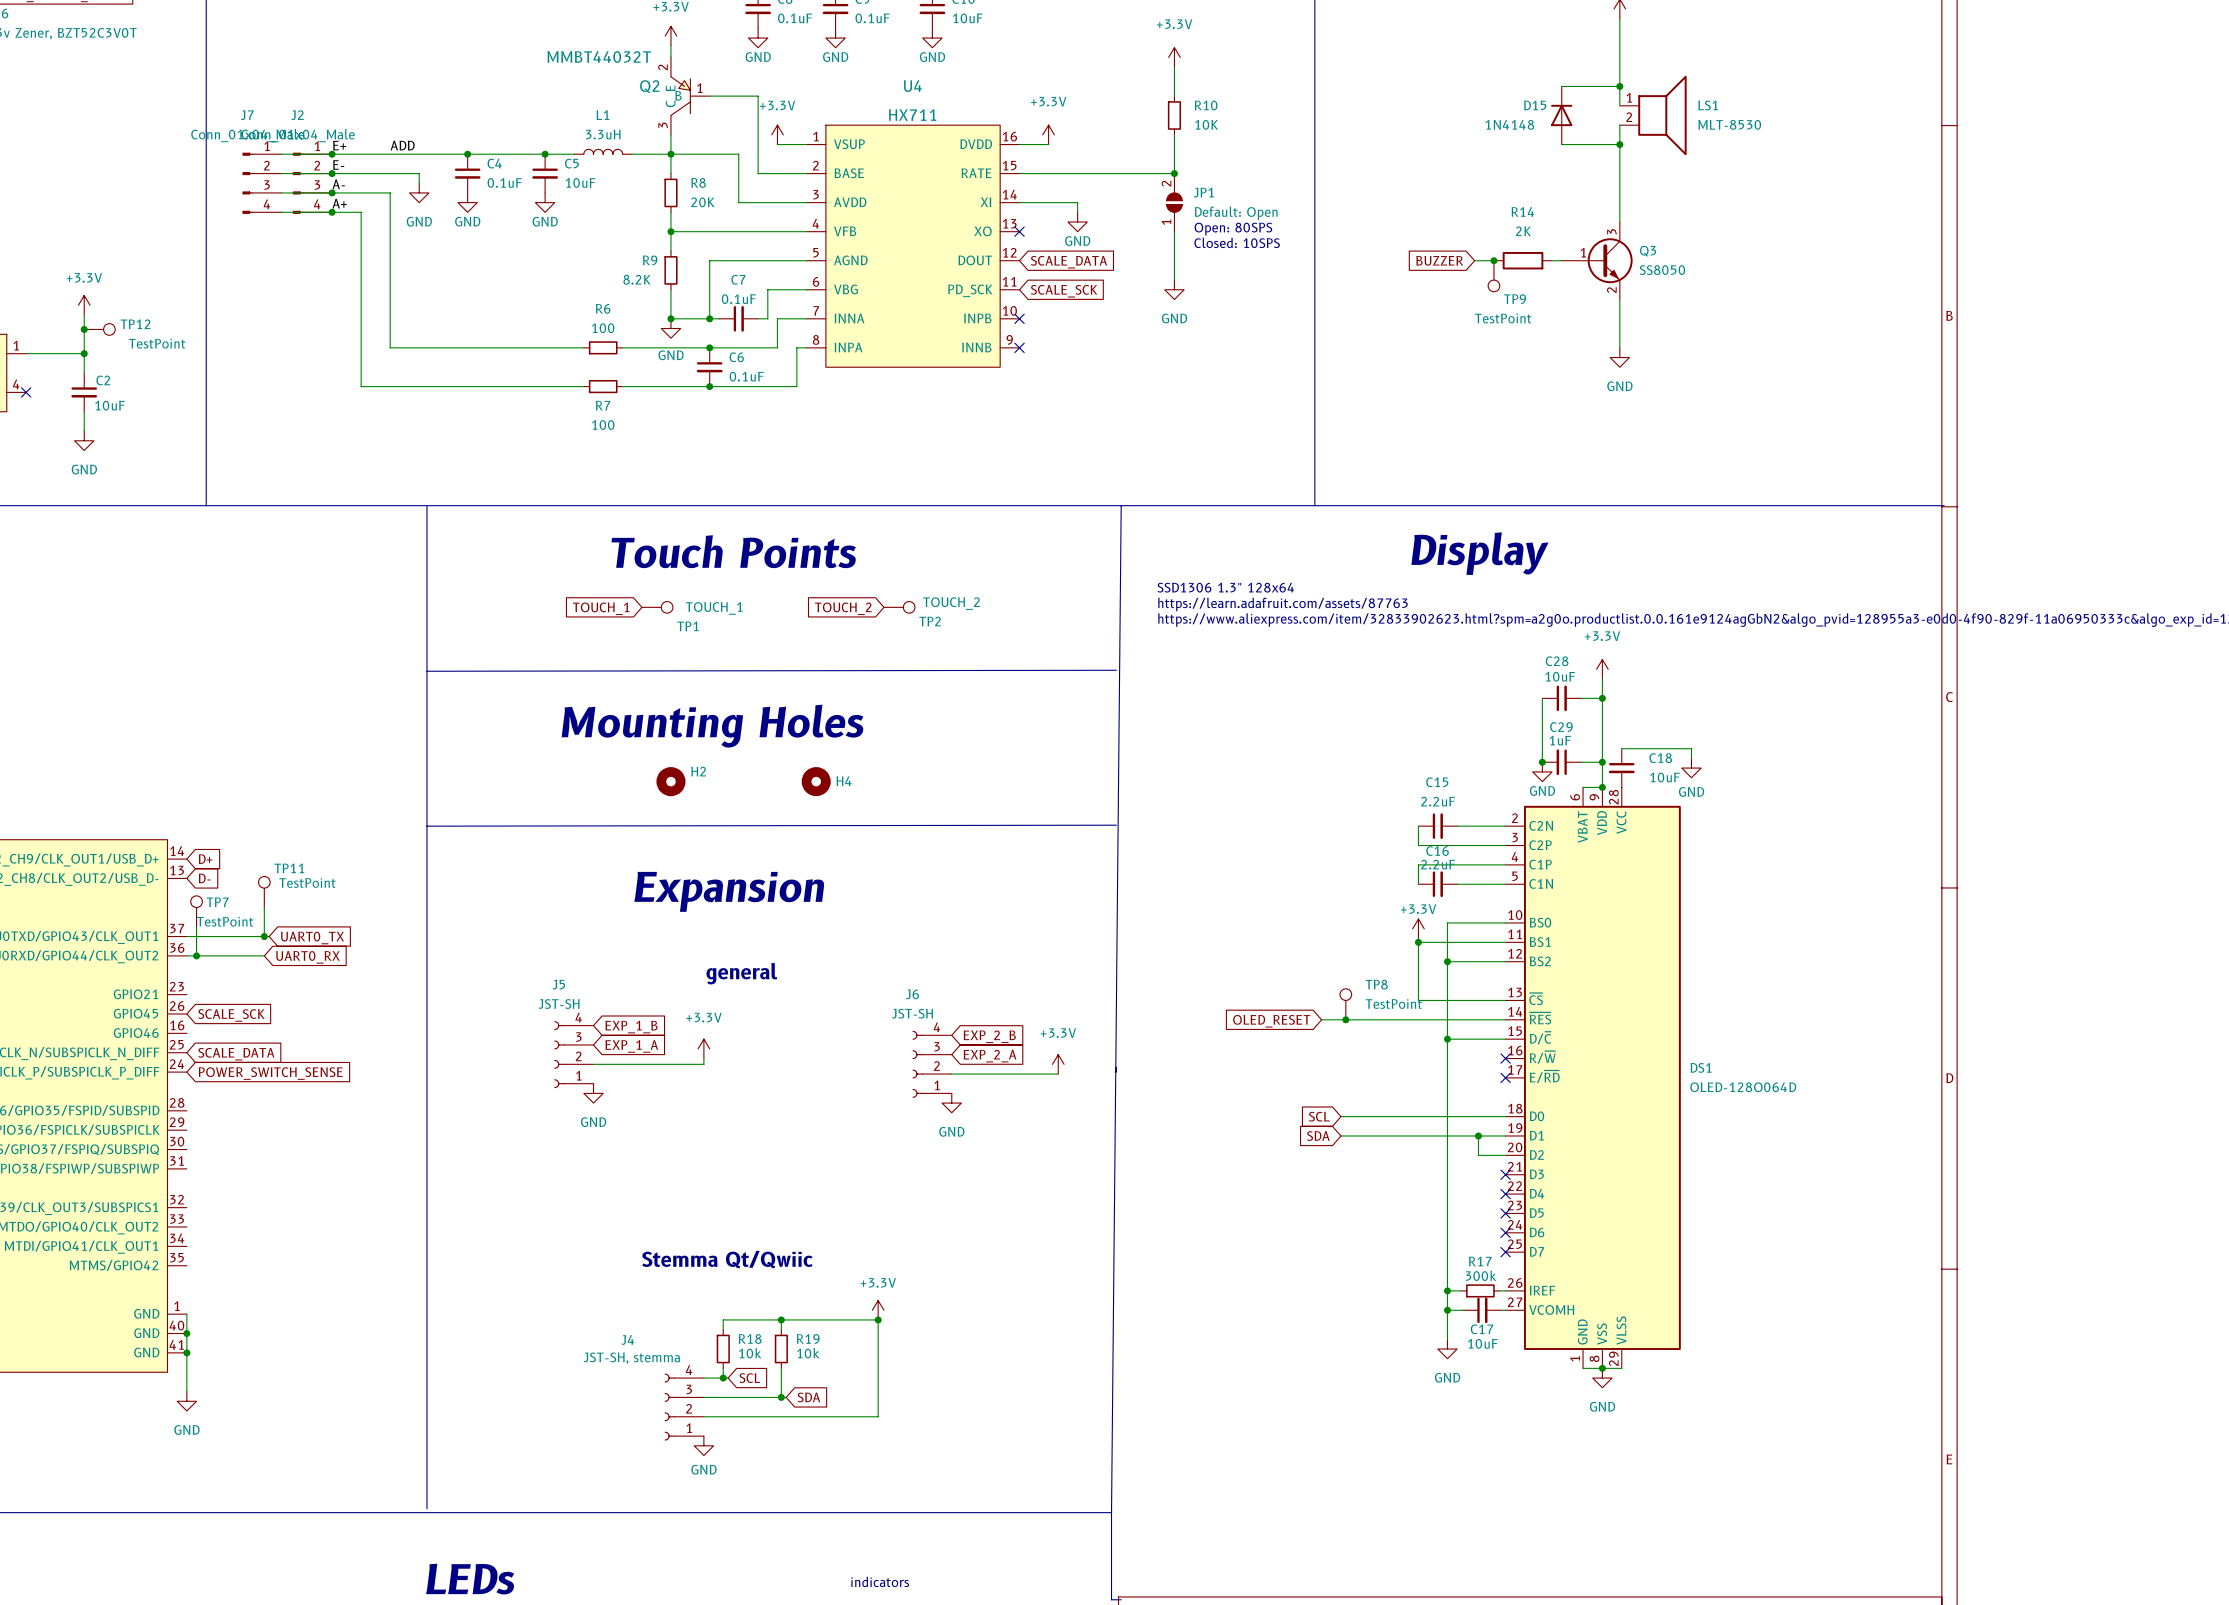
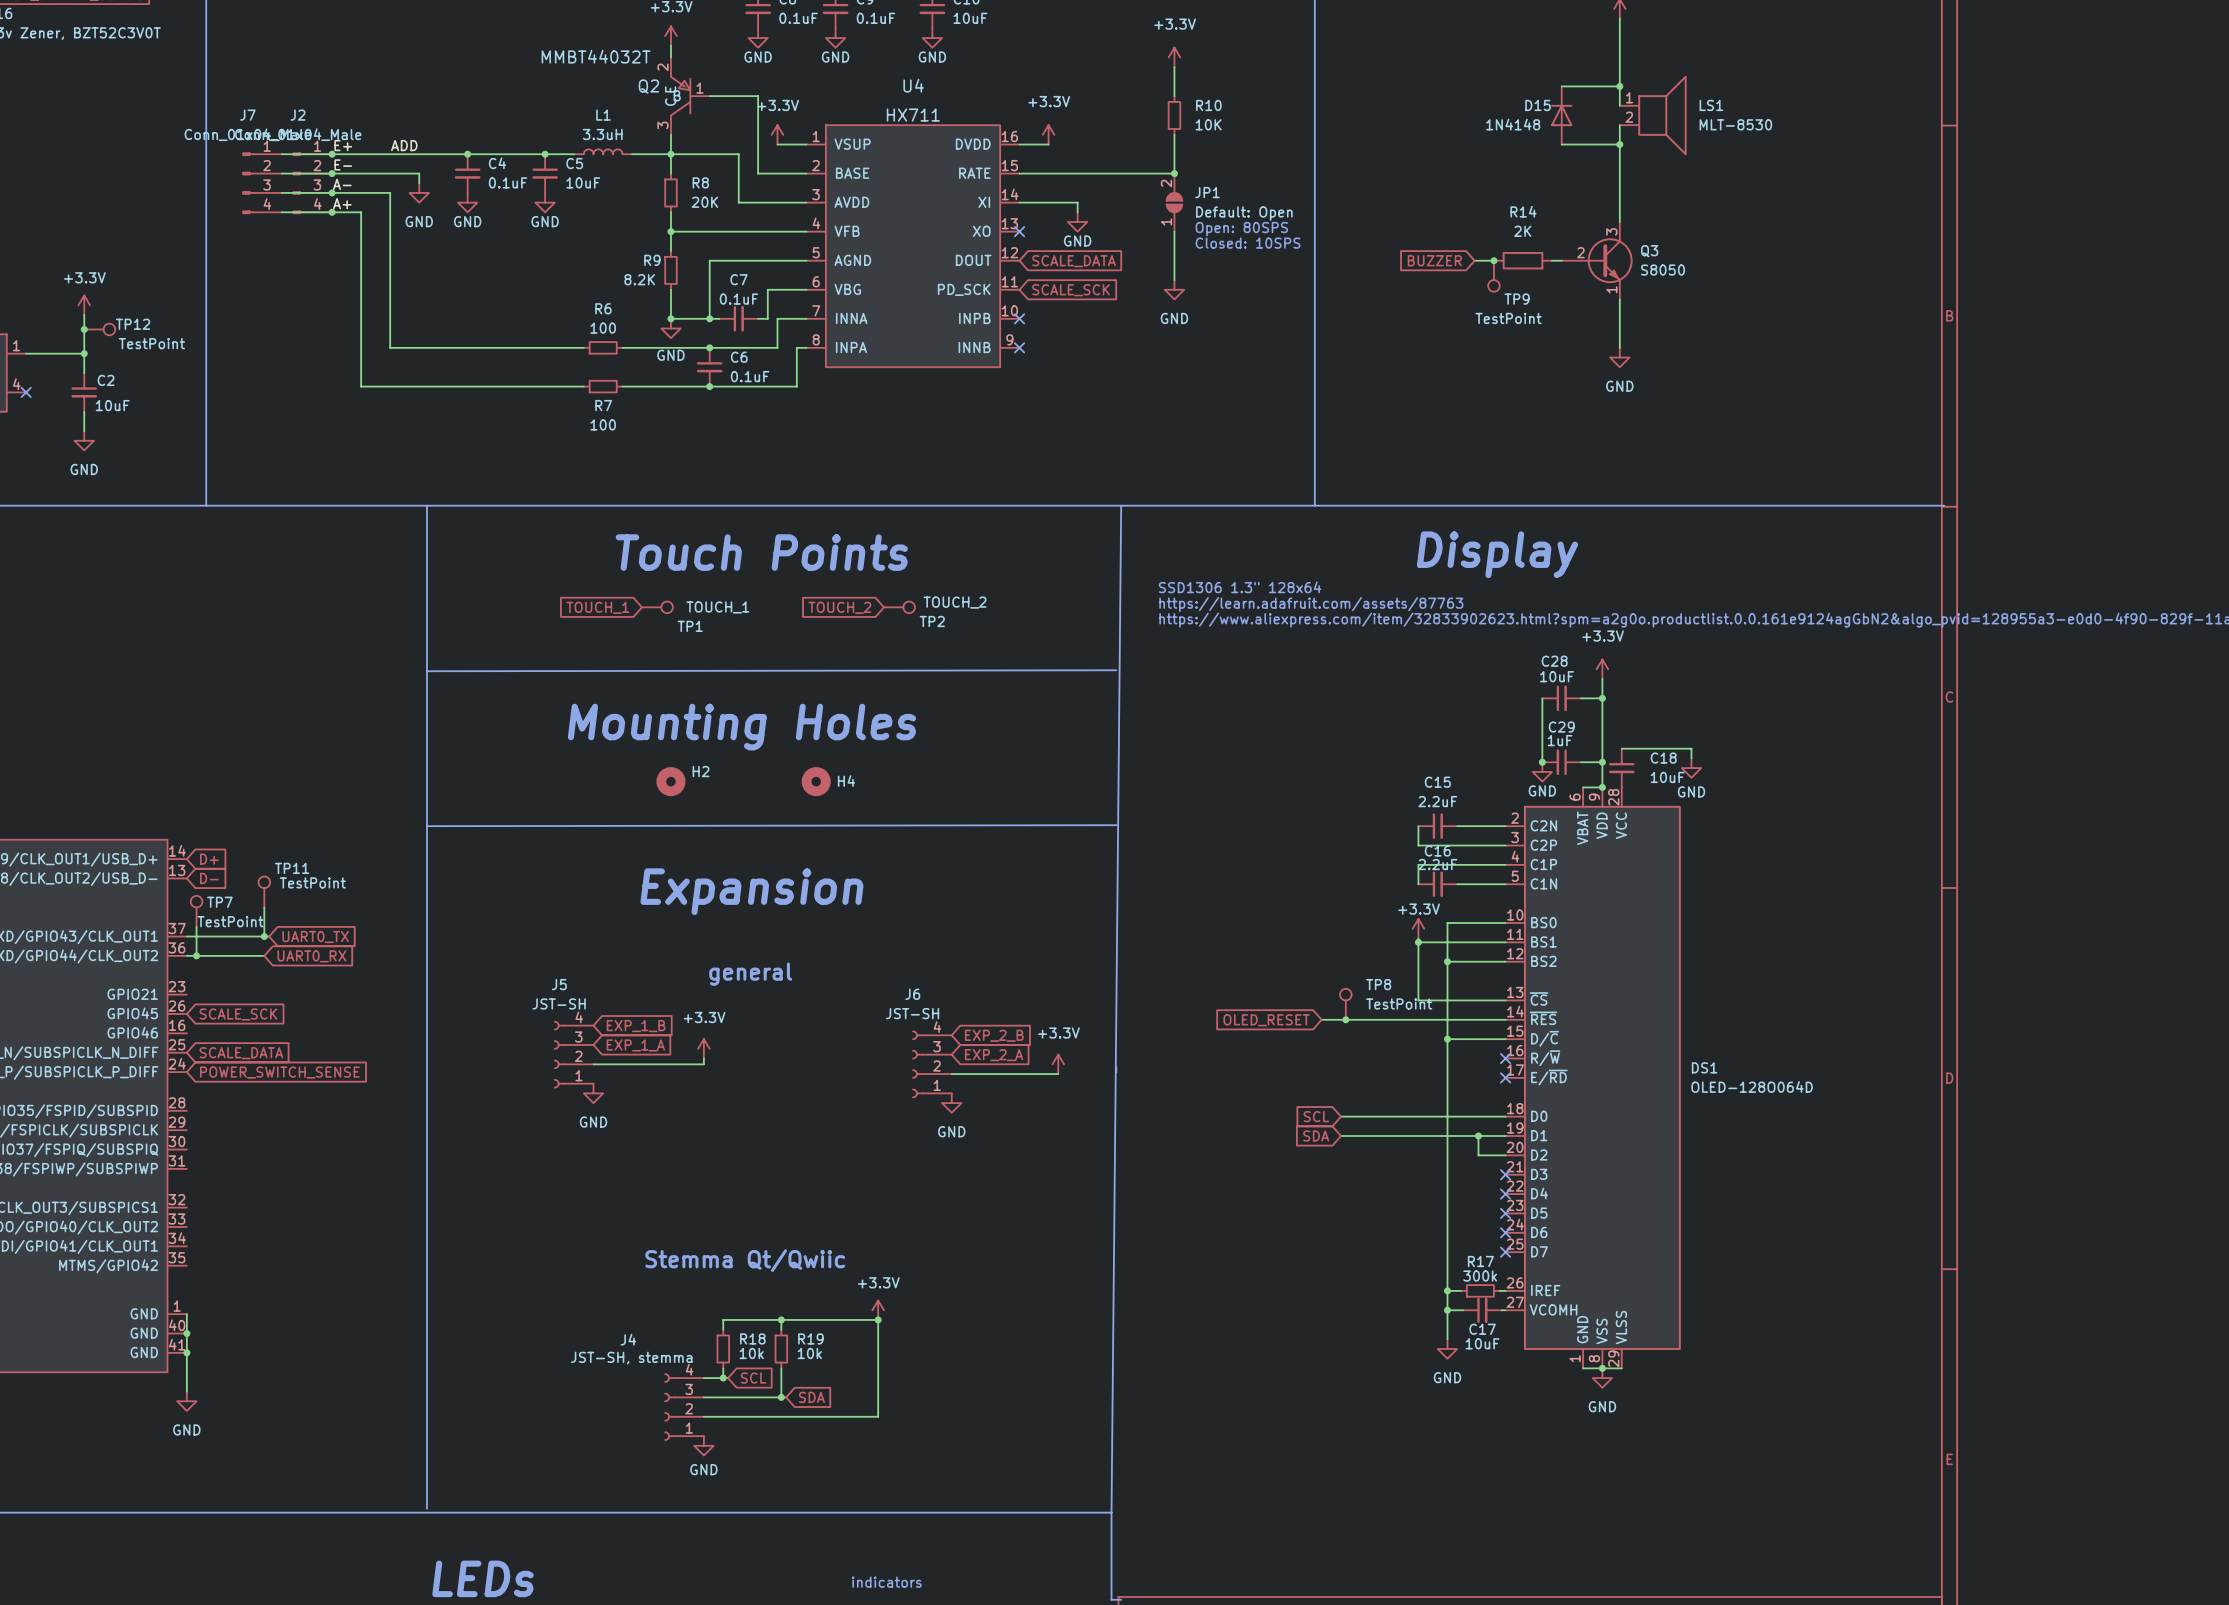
Q3 symbol: [1561, 221, 1633, 300] -> [1561, 221, 1633, 300]
Q3 value: SS8050 (1662, 270) -> S8050 (1663, 270)

